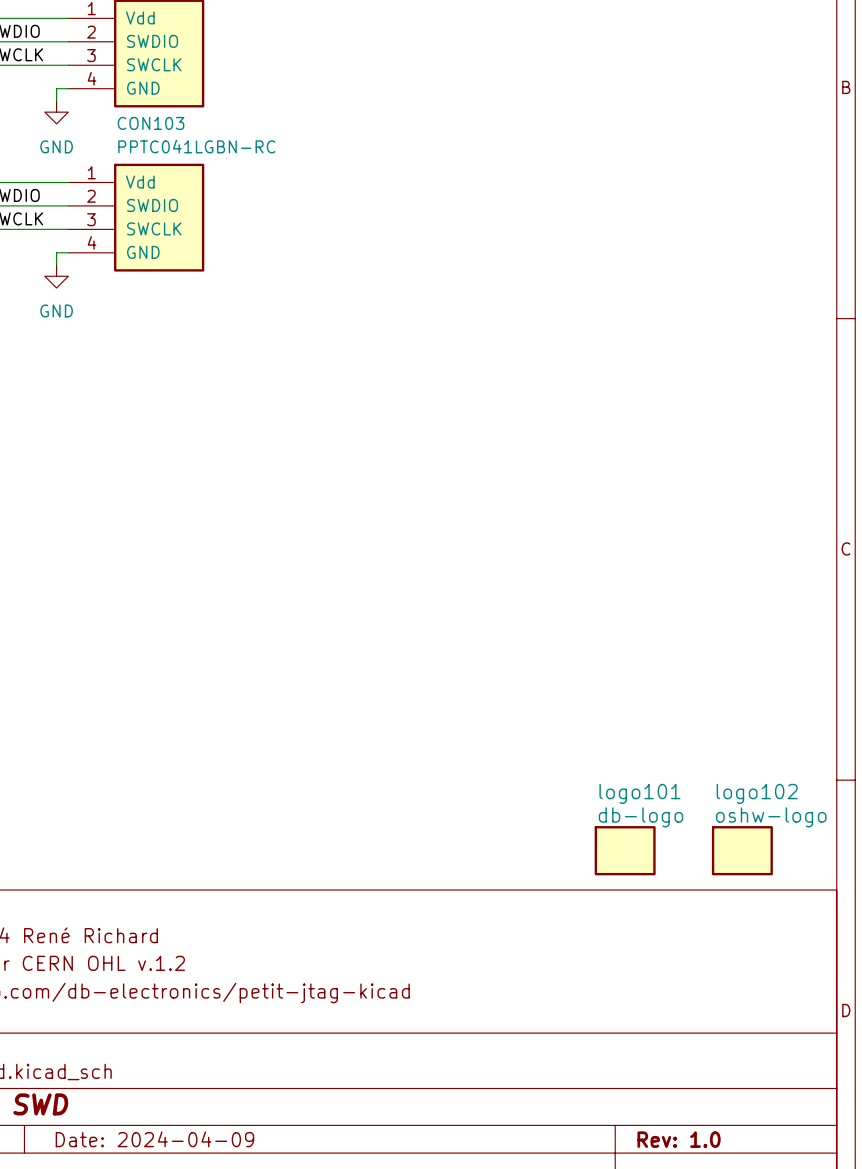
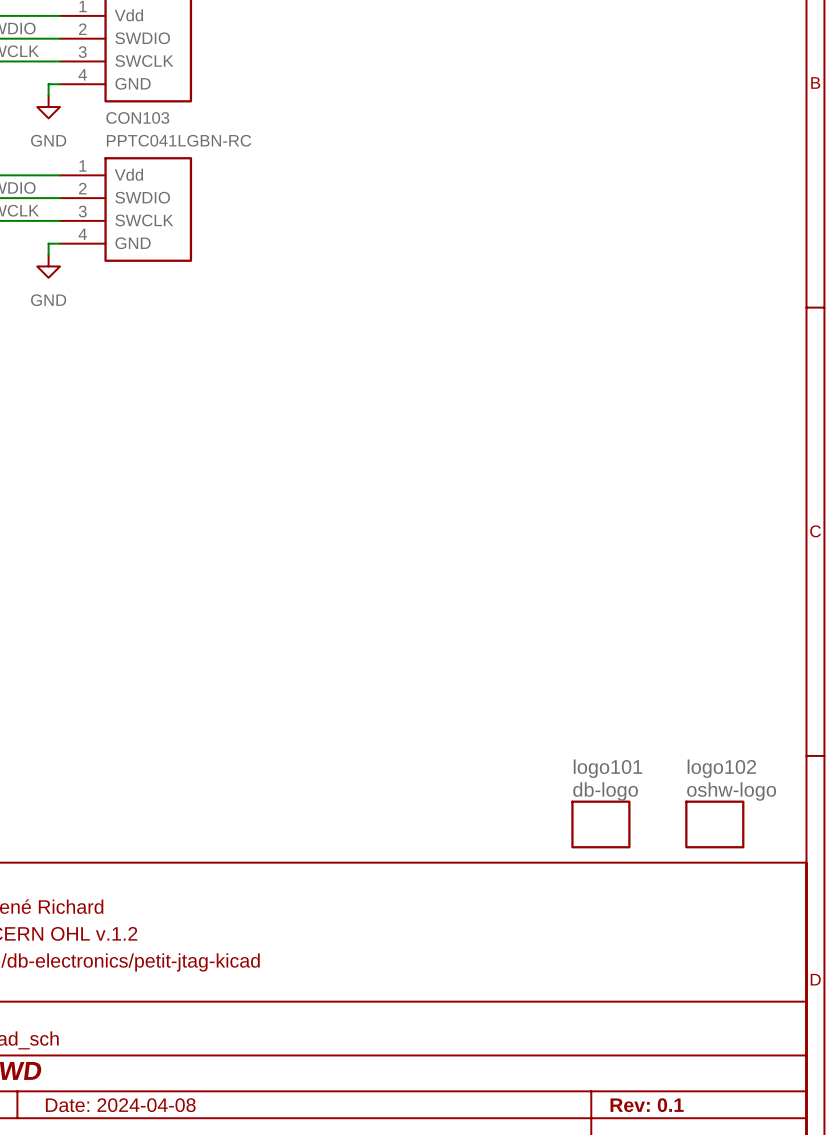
title block: Date: 2024-04-09 (154, 1139) -> Date: 2024-04-08 (120, 1105)
title block: Rev: 1.0 (679, 1139) -> Rev: 0.1 (647, 1105)

